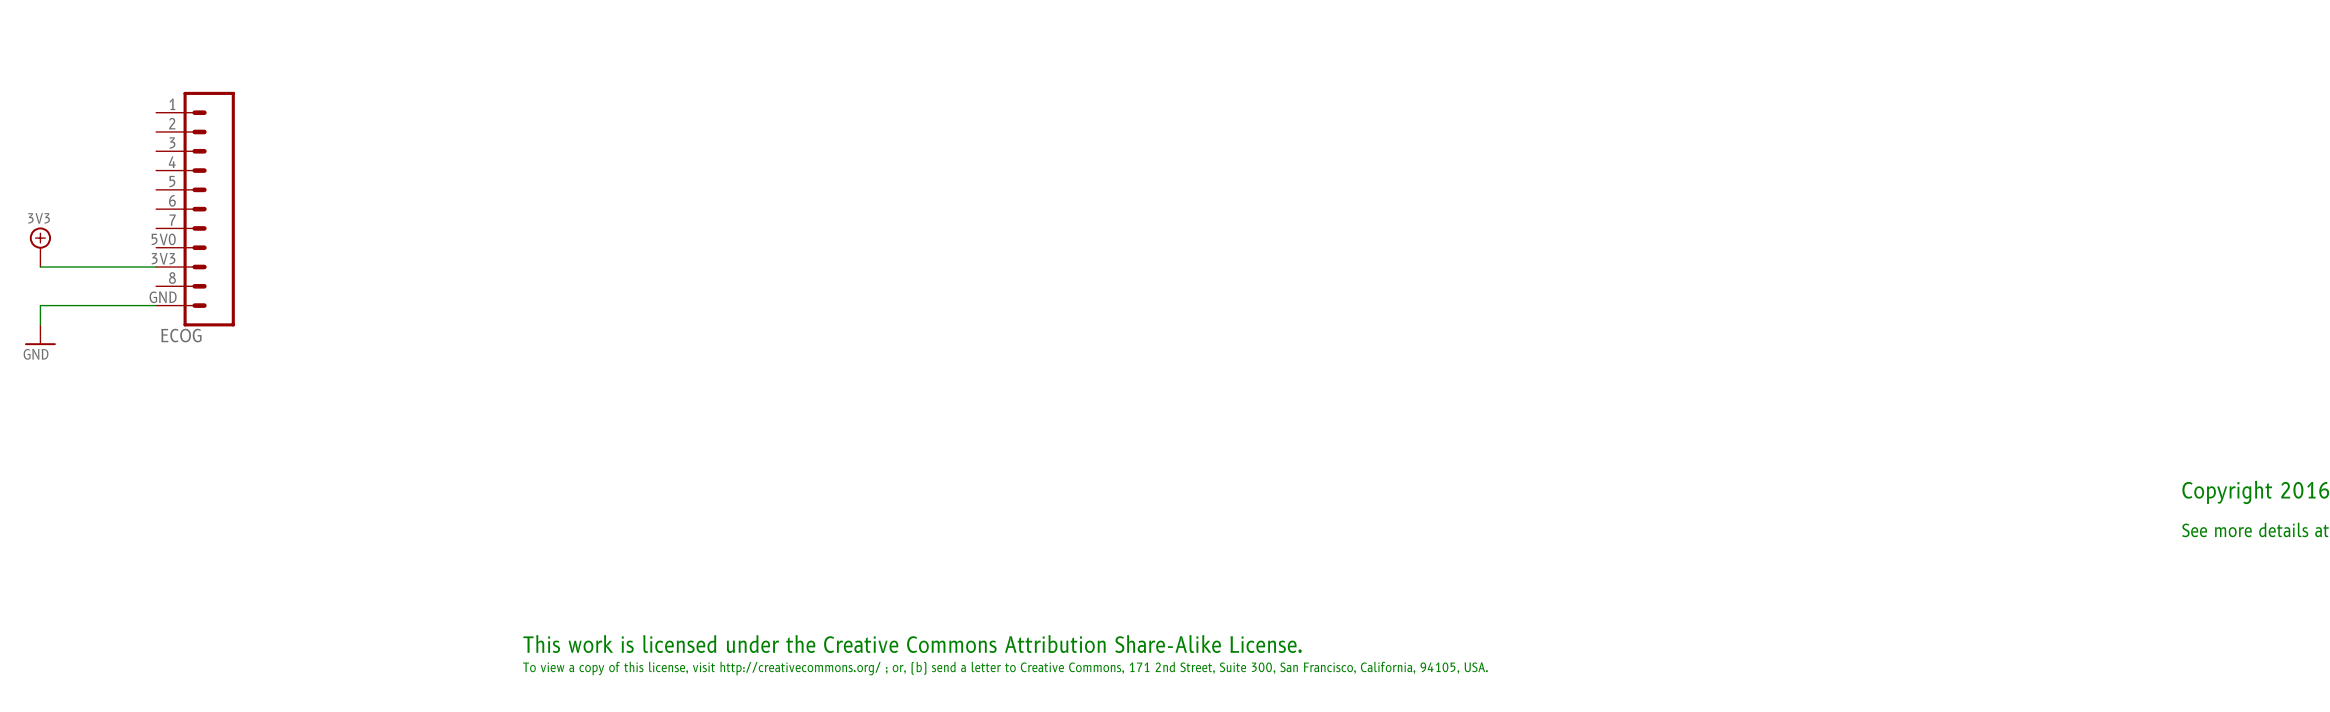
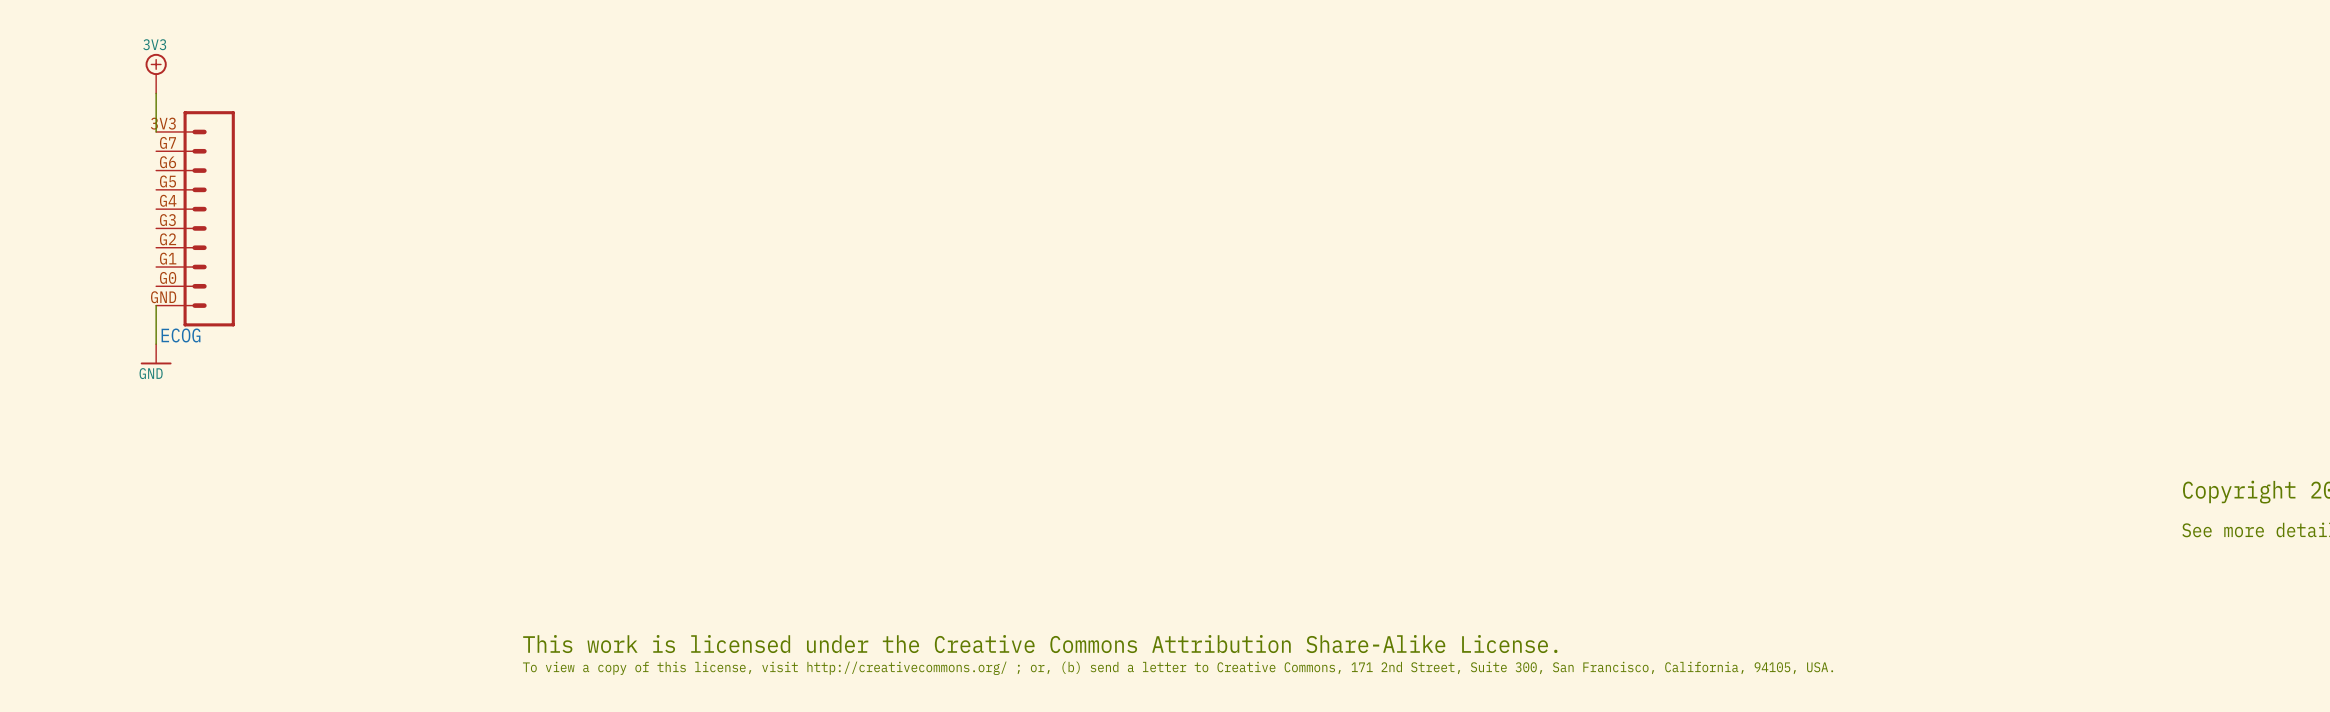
power symbol: none -> 3V3 (156, 73)
wire: none -> (156, 93) (156, 131)
ECOG: (195, 209) -> none
ECOG: none -> (195, 218)
power symbol: 3V3 (40, 247) -> none
wire: (40, 267) (156, 267) -> none
wire: (156, 305) (40, 305) (40, 324) -> (156, 305) (156, 344)
power symbol position: GND (40, 335) -> GND (156, 354)

